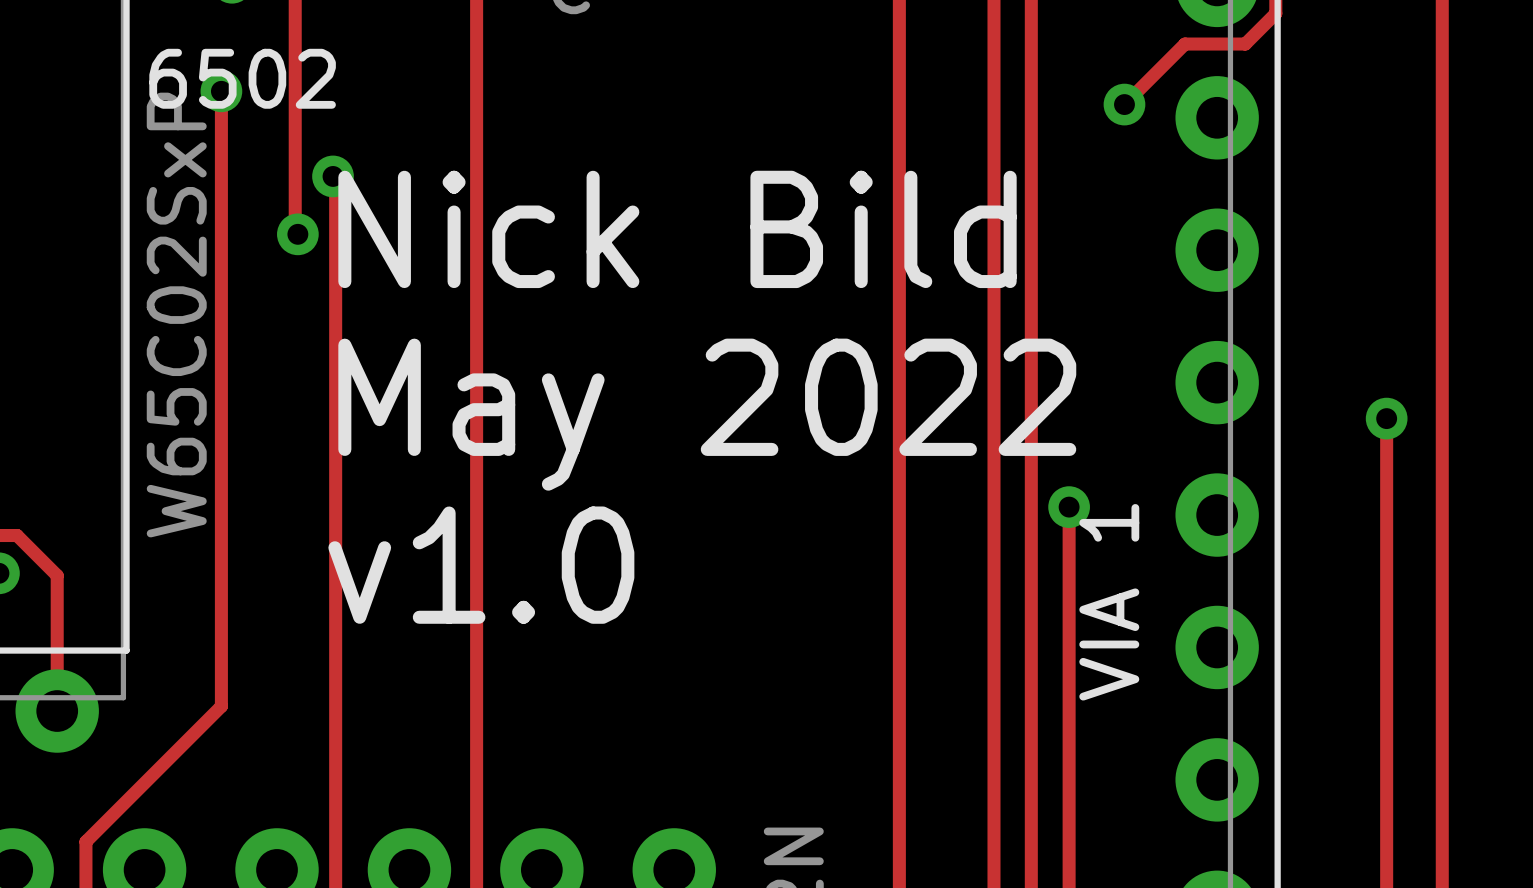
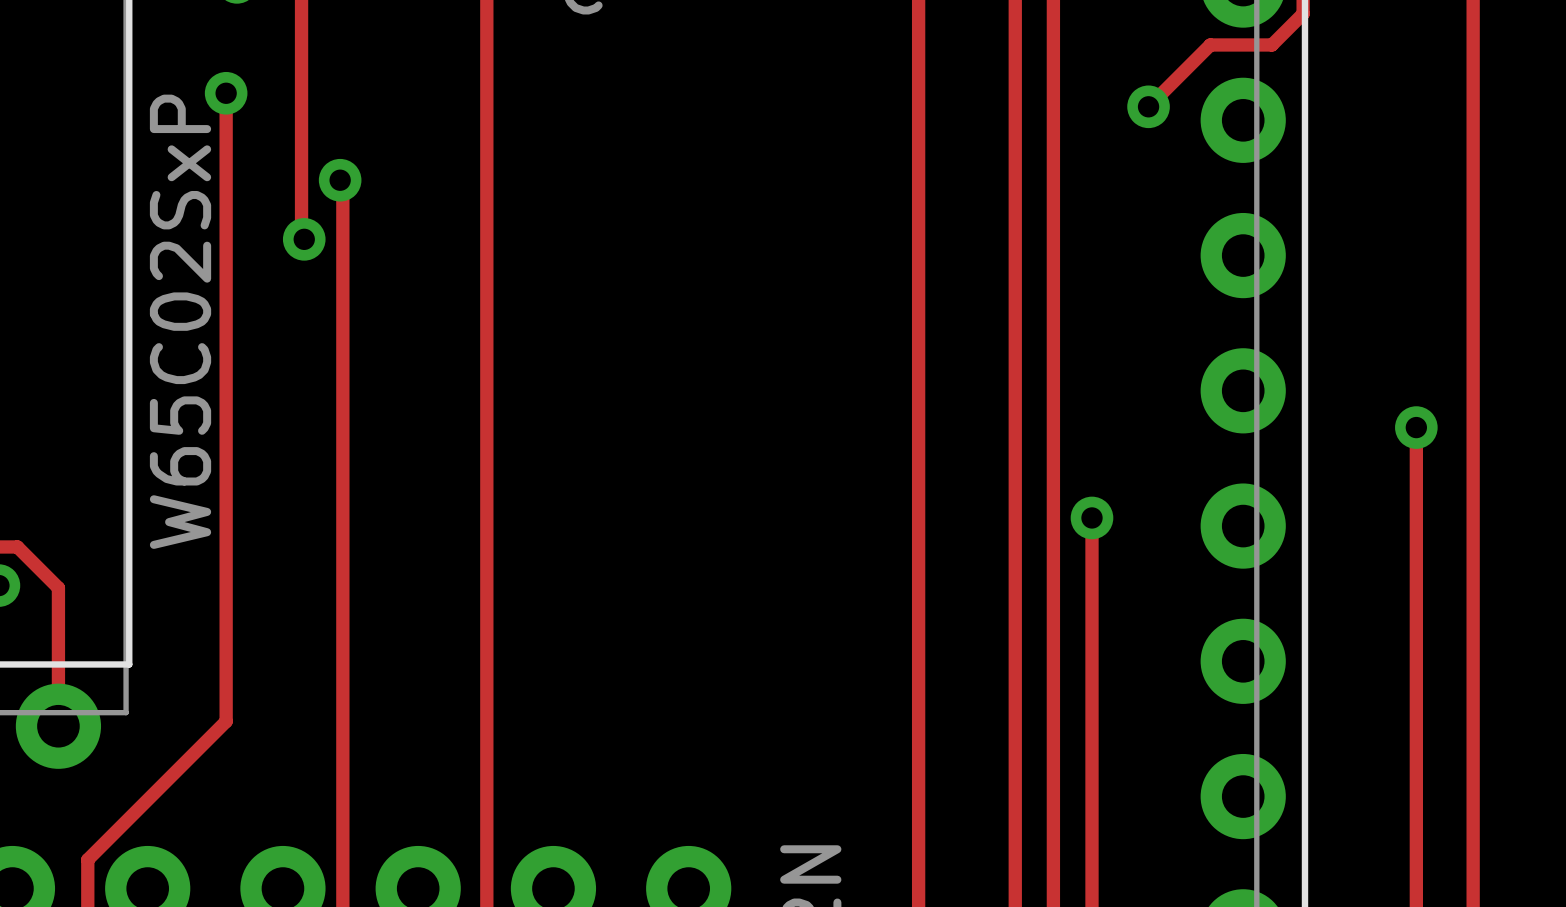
text: 6502 (242, 78) -> none
text: Nick Bild (677, 229) -> none
text: May 2022 (707, 414) -> none
text: v1.0 (481, 565) -> none
text: VIA 1 (1109, 602) -> none

